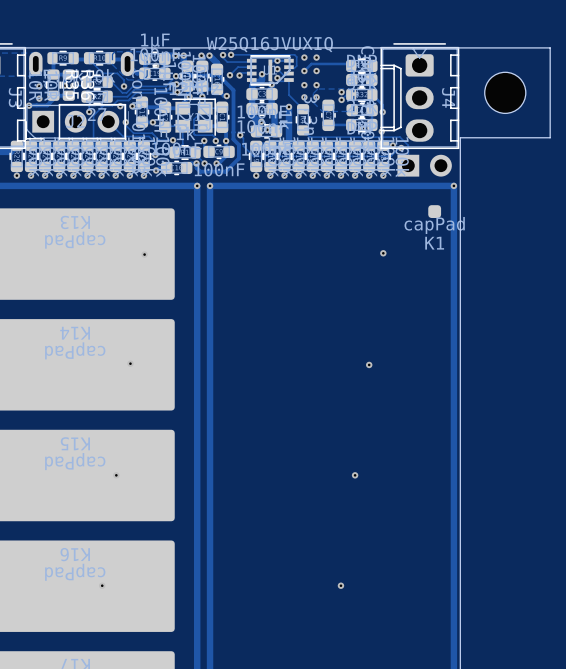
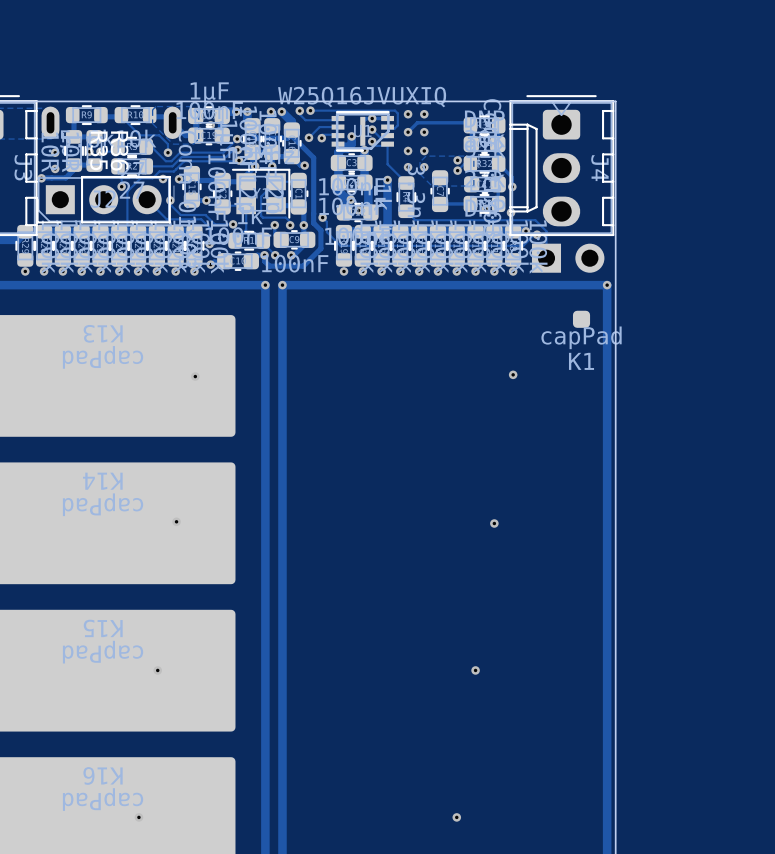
board edge: (460, 47) (550, 47) (550, 137) (460, 137) -> (615, 101) (615, 221)
part: (505, 92) -> none

